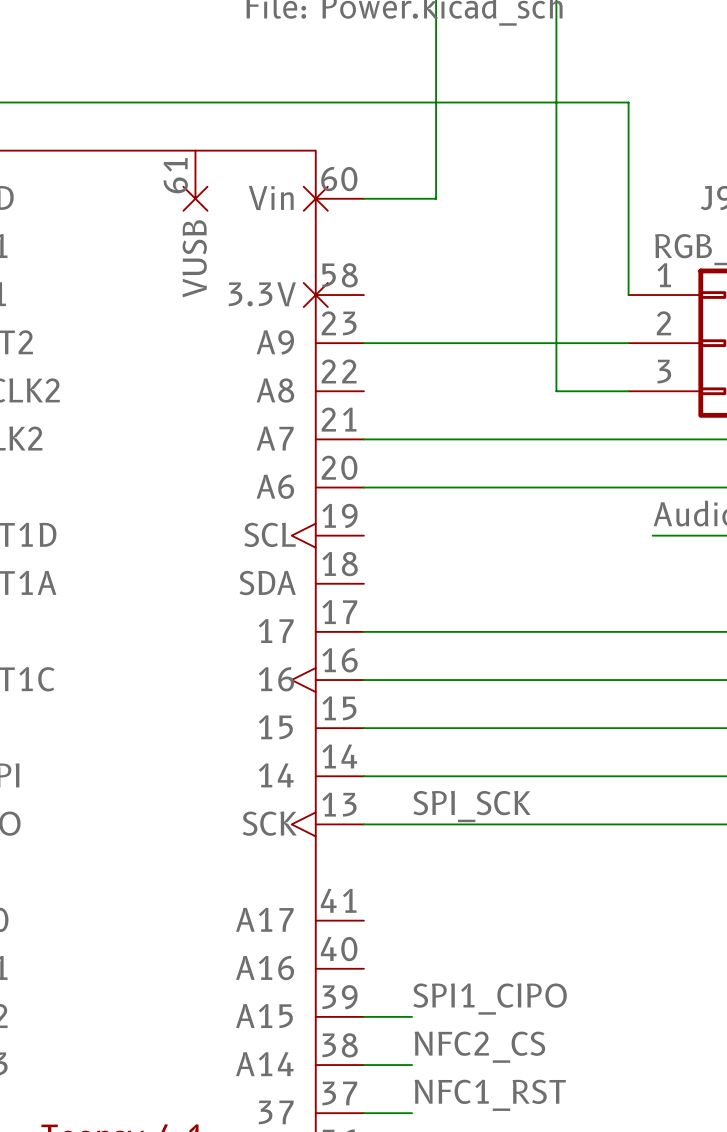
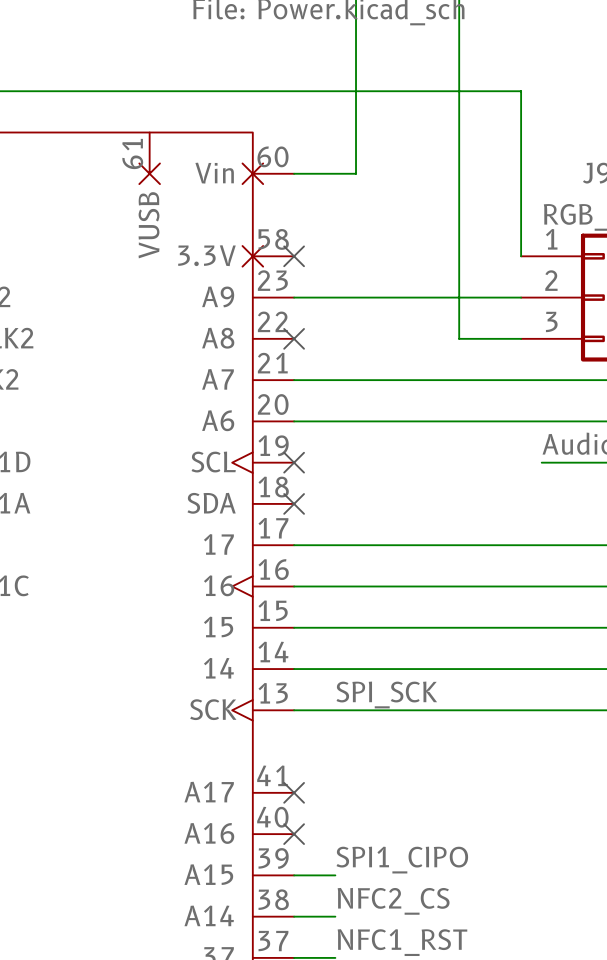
no-connect mark: none -> (294, 256)
no-connect mark: none -> (294, 338)
no-connect mark: none -> (294, 462)
no-connect mark: none -> (294, 503)
no-connect mark: none -> (294, 792)
no-connect mark: none -> (294, 834)

